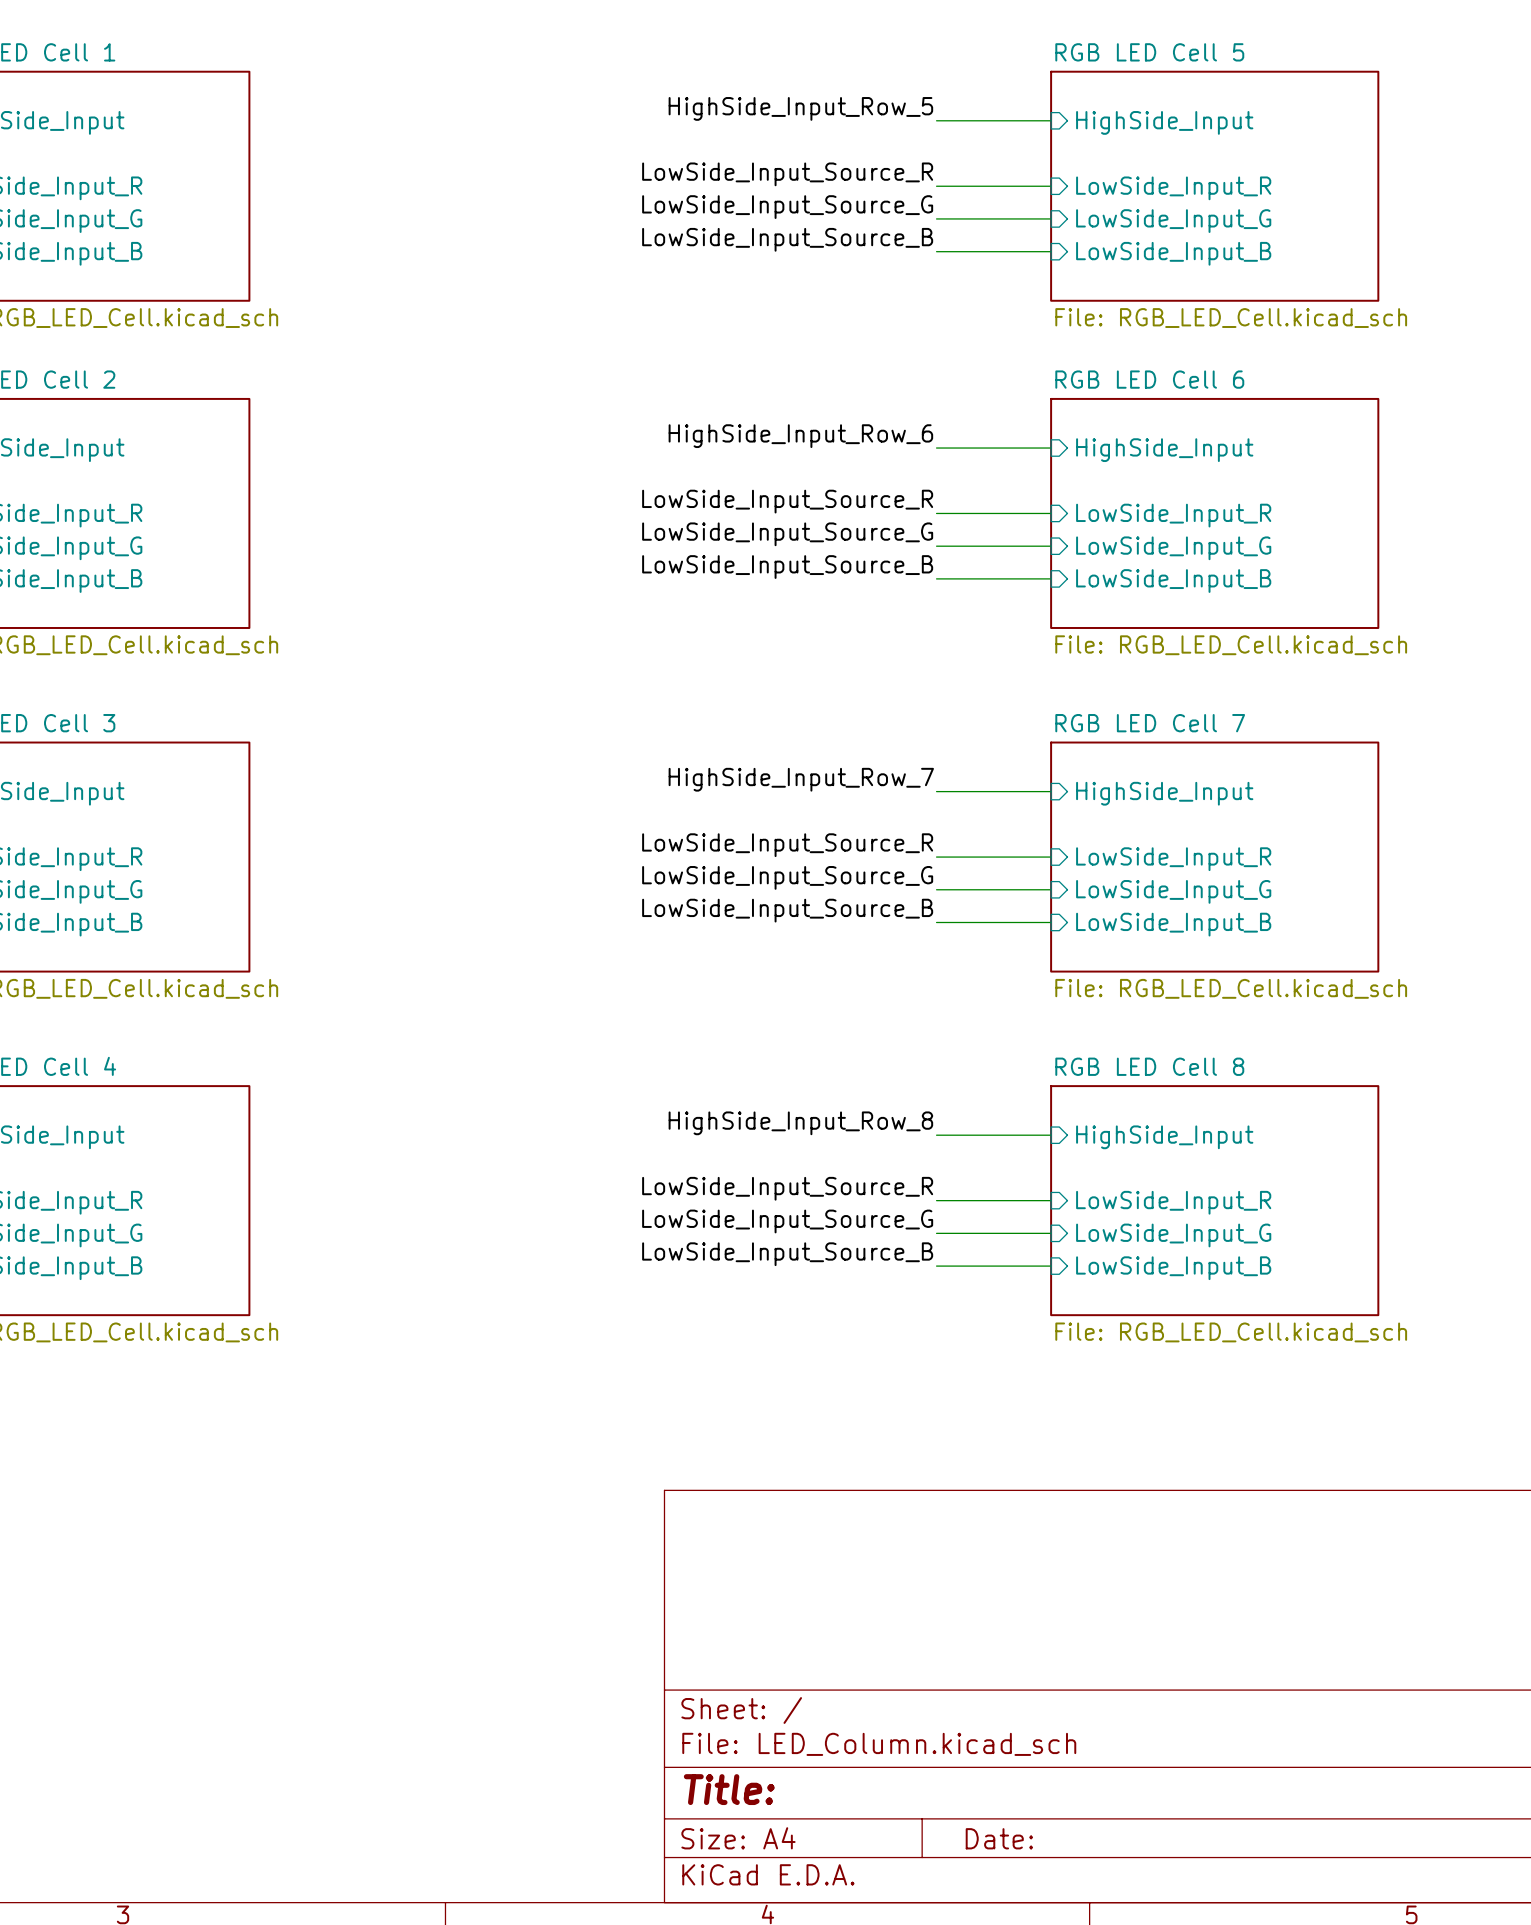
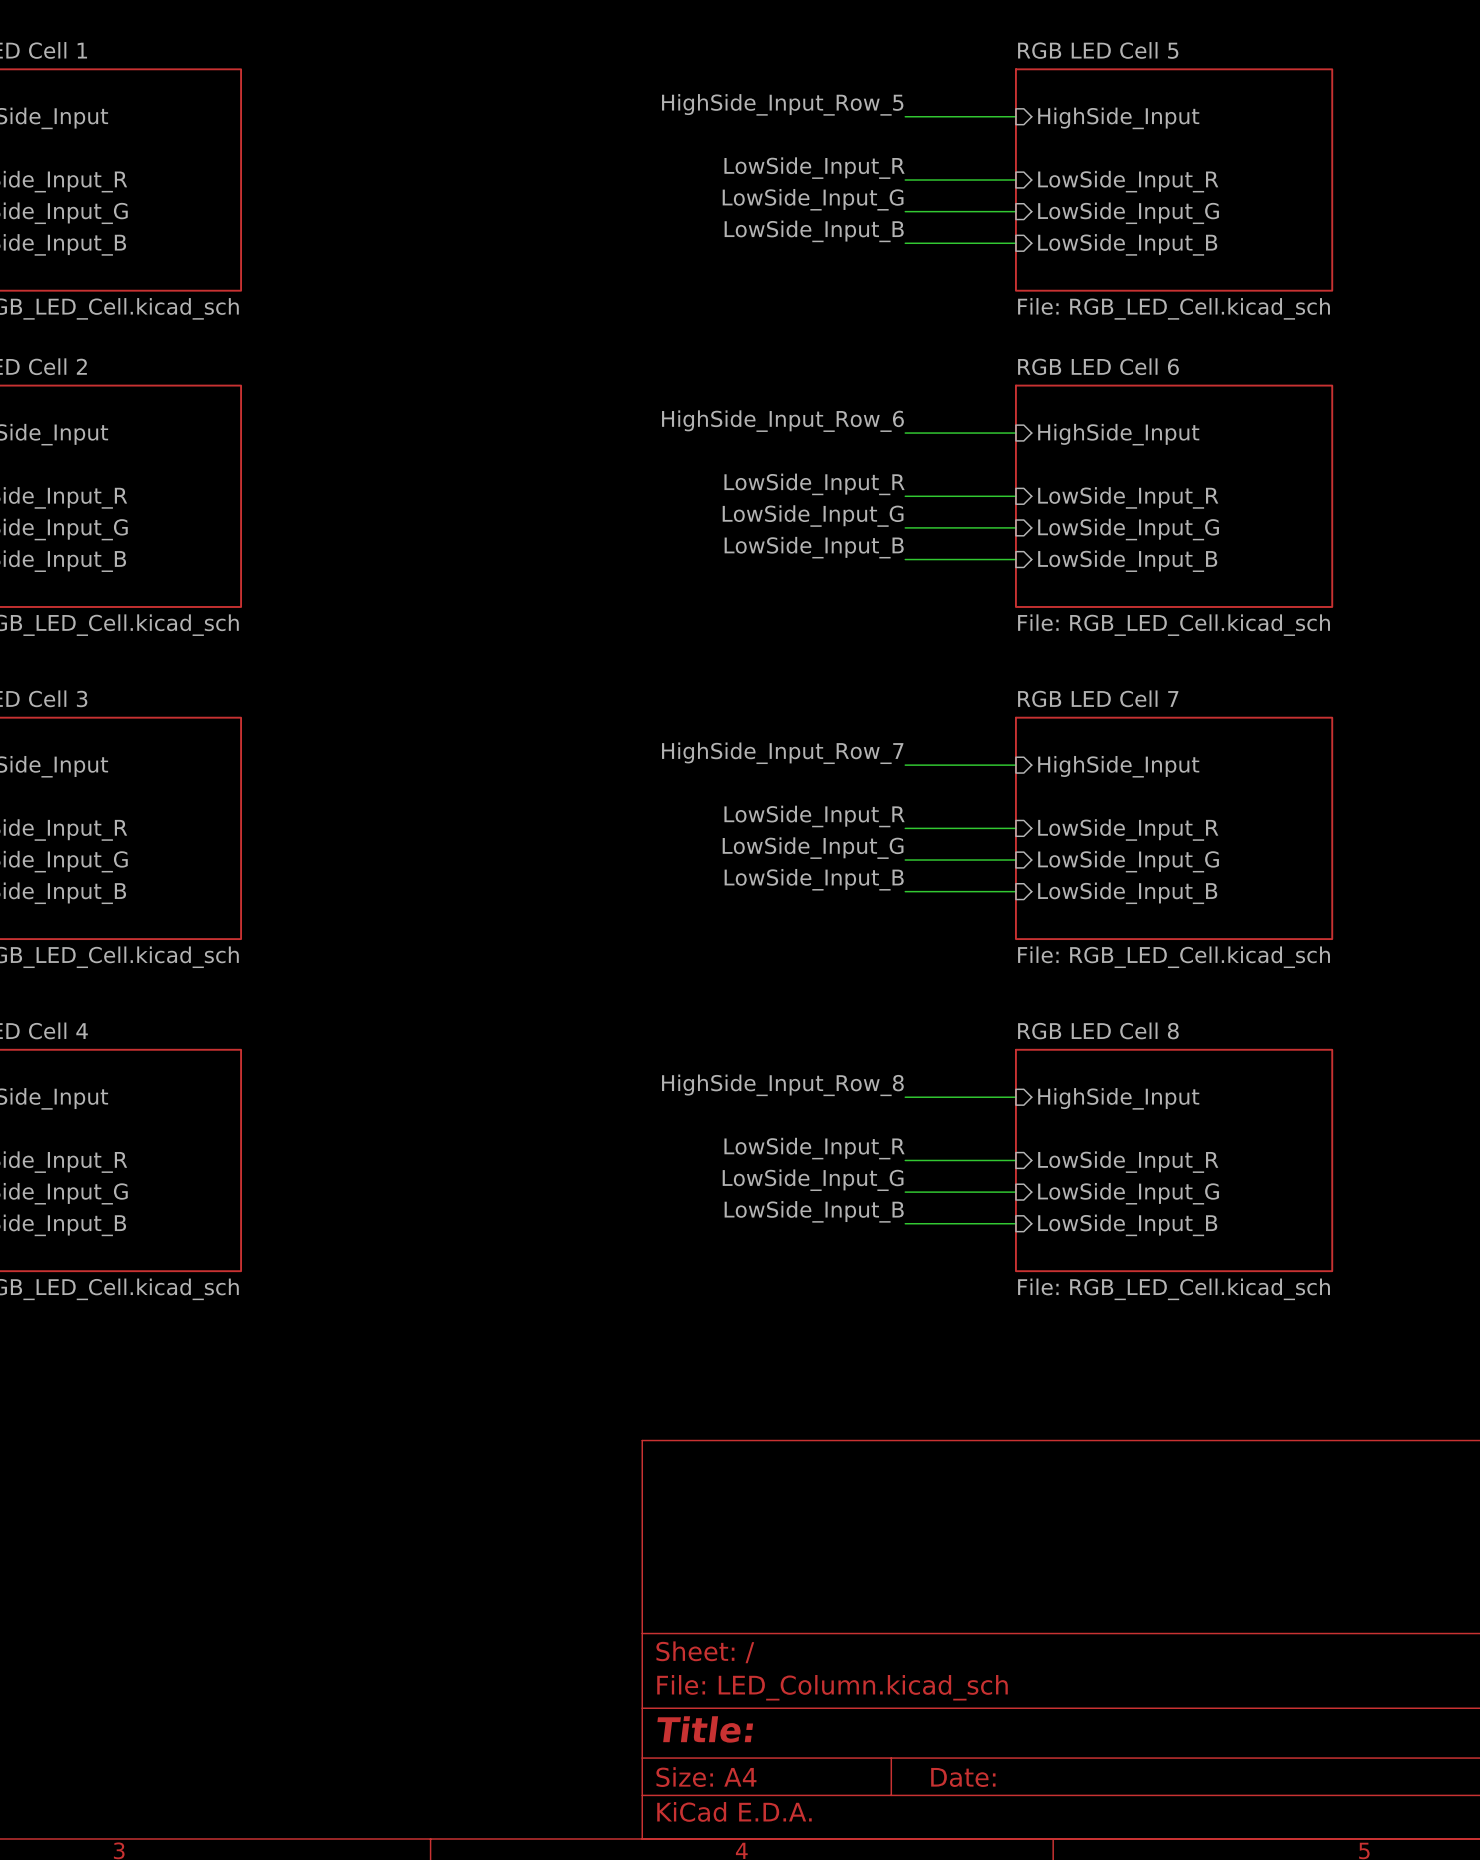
label: LowSide_Input_Source_R (787, 174) -> LowSide_Input_R (814, 168)
label: LowSide_Input_Source_G (787, 207) -> LowSide_Input_G (813, 199)
label: LowSide_Input_Source_B (787, 239) -> LowSide_Input_B (814, 231)
label: LowSide_Input_Source_R (787, 501) -> LowSide_Input_R (814, 484)
label: LowSide_Input_Source_G (787, 534) -> LowSide_Input_G (813, 516)
label: LowSide_Input_Source_B (787, 567) -> LowSide_Input_B (814, 547)
label: LowSide_Input_Source_R (787, 845) -> LowSide_Input_R (814, 816)
label: LowSide_Input_Source_G (787, 877) -> LowSide_Input_G (813, 848)
label: LowSide_Input_Source_B (787, 910) -> LowSide_Input_B (814, 879)
label: LowSide_Input_Source_R (787, 1188) -> LowSide_Input_R (814, 1148)
label: LowSide_Input_Source_G (787, 1221) -> LowSide_Input_G (813, 1180)
label: LowSide_Input_Source_B (787, 1254) -> LowSide_Input_B (814, 1211)

